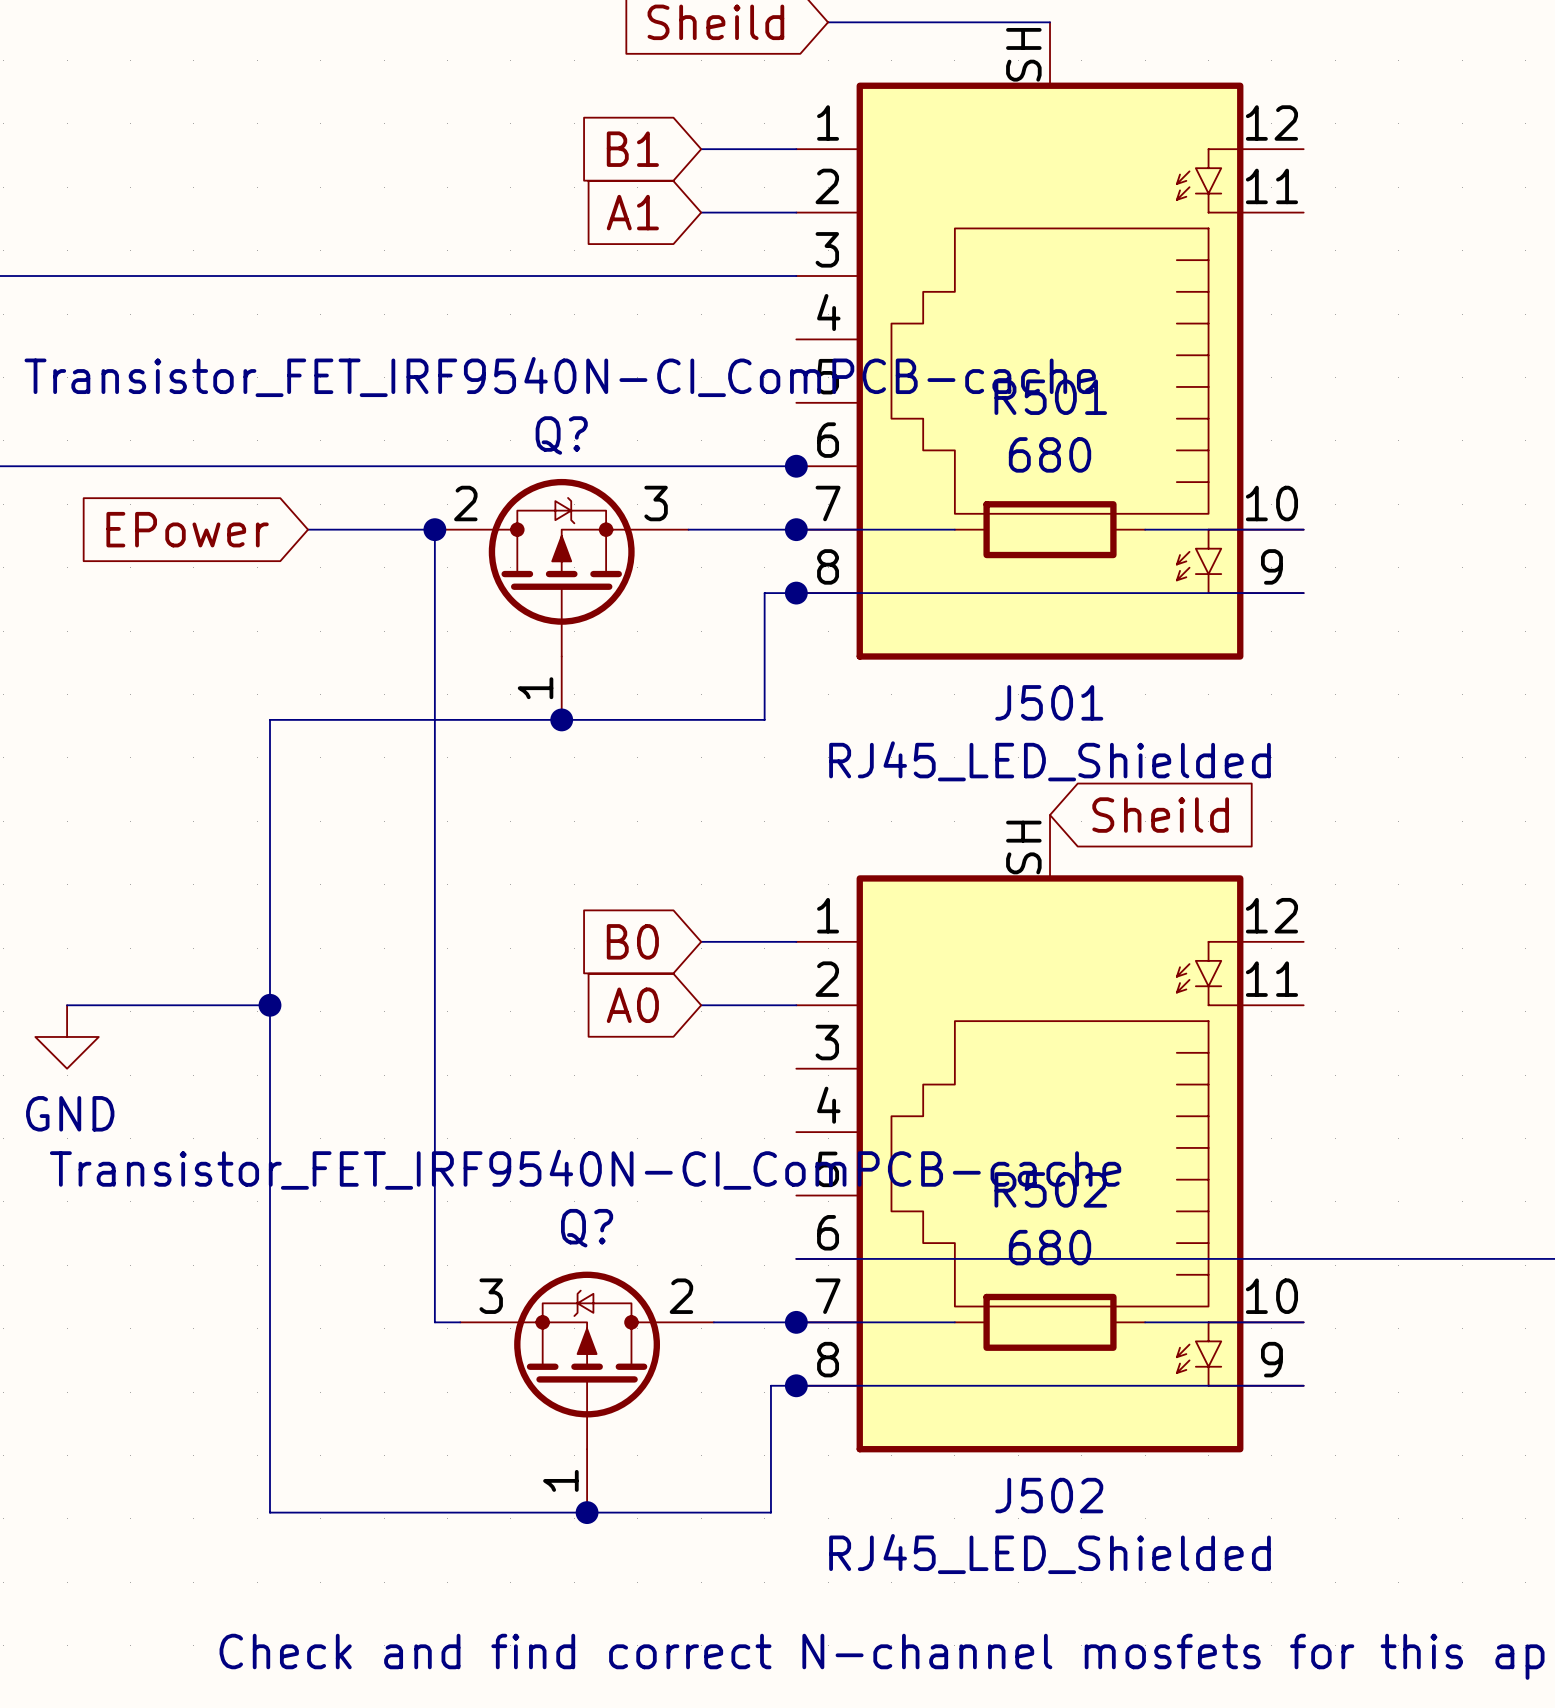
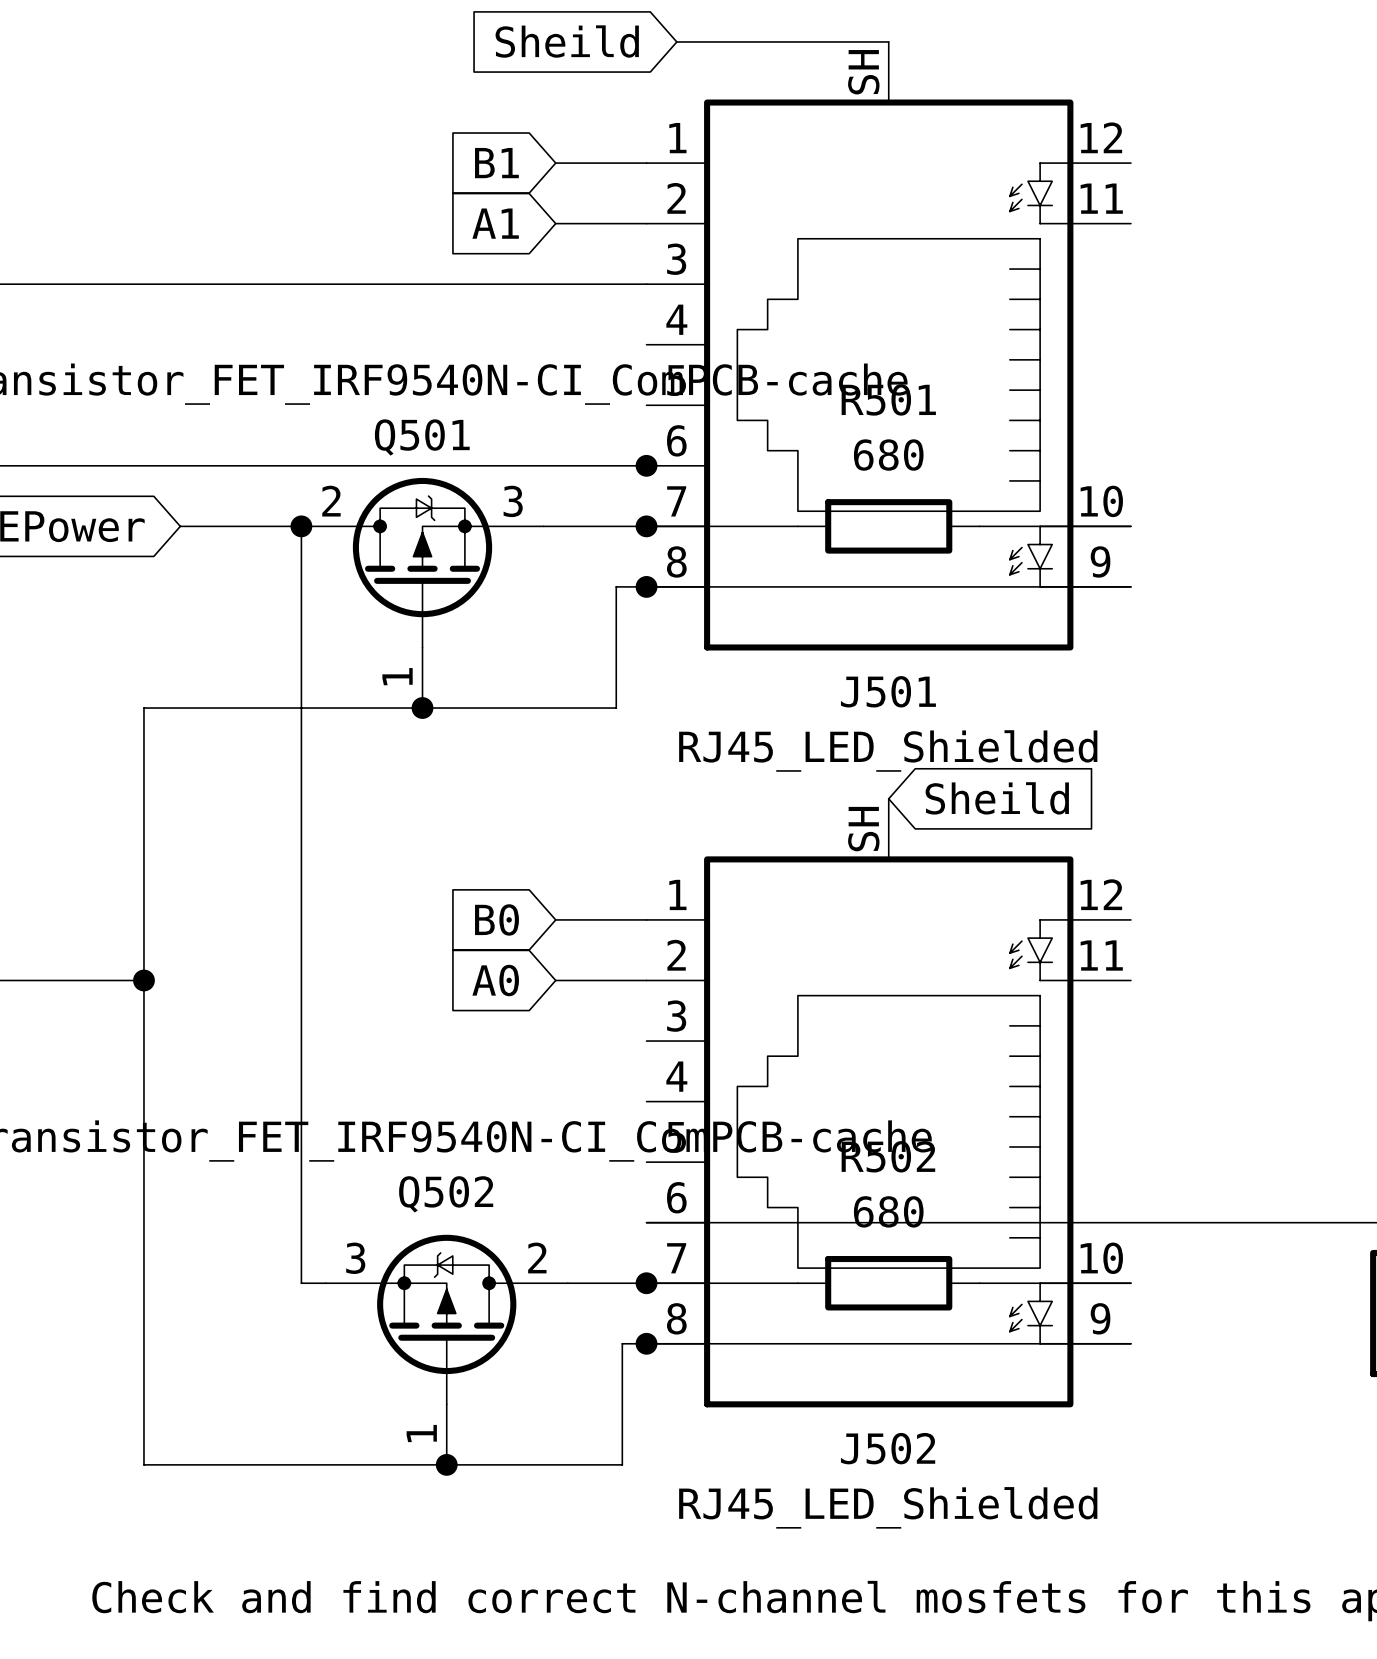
Q? name: Q? (561, 435) -> Q501 (422, 437)
Q? name: Q? (587, 1228) -> Q502 (446, 1194)

